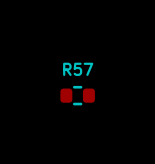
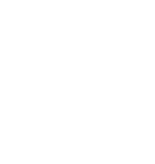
R57: (77, 95) -> none

